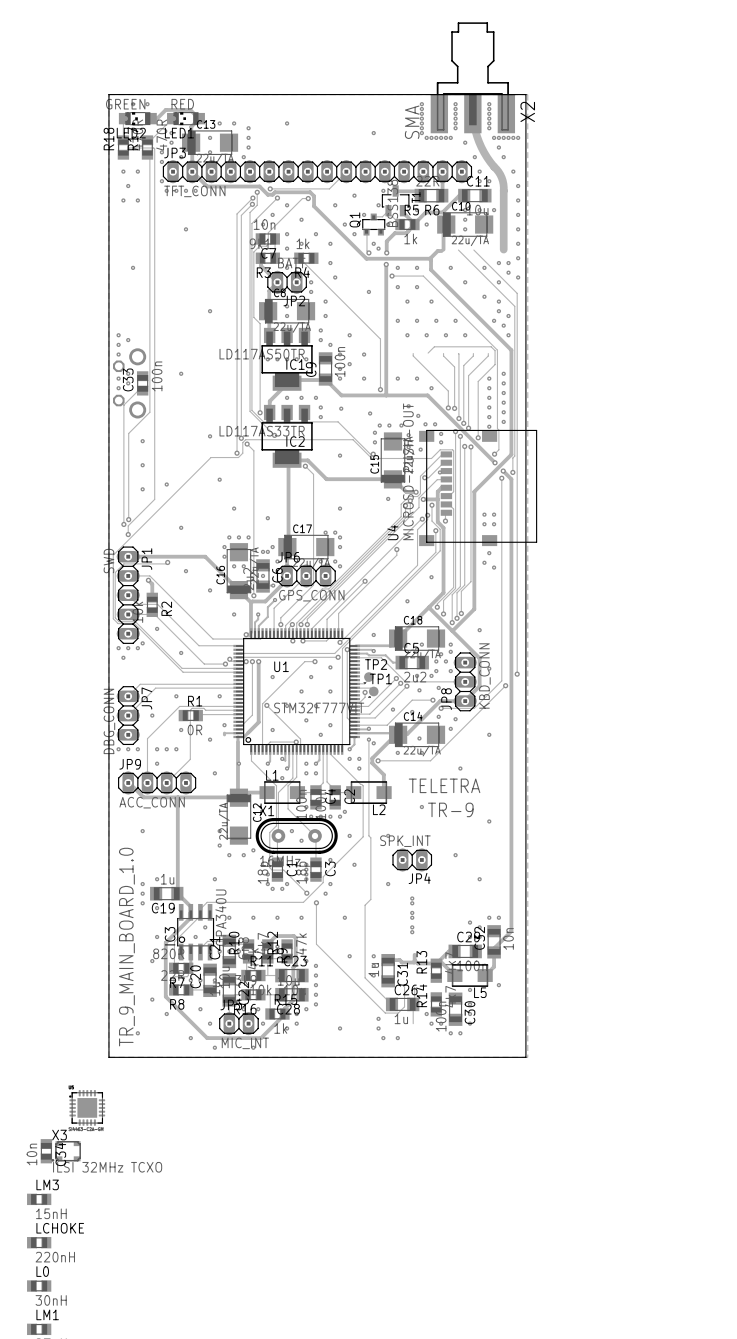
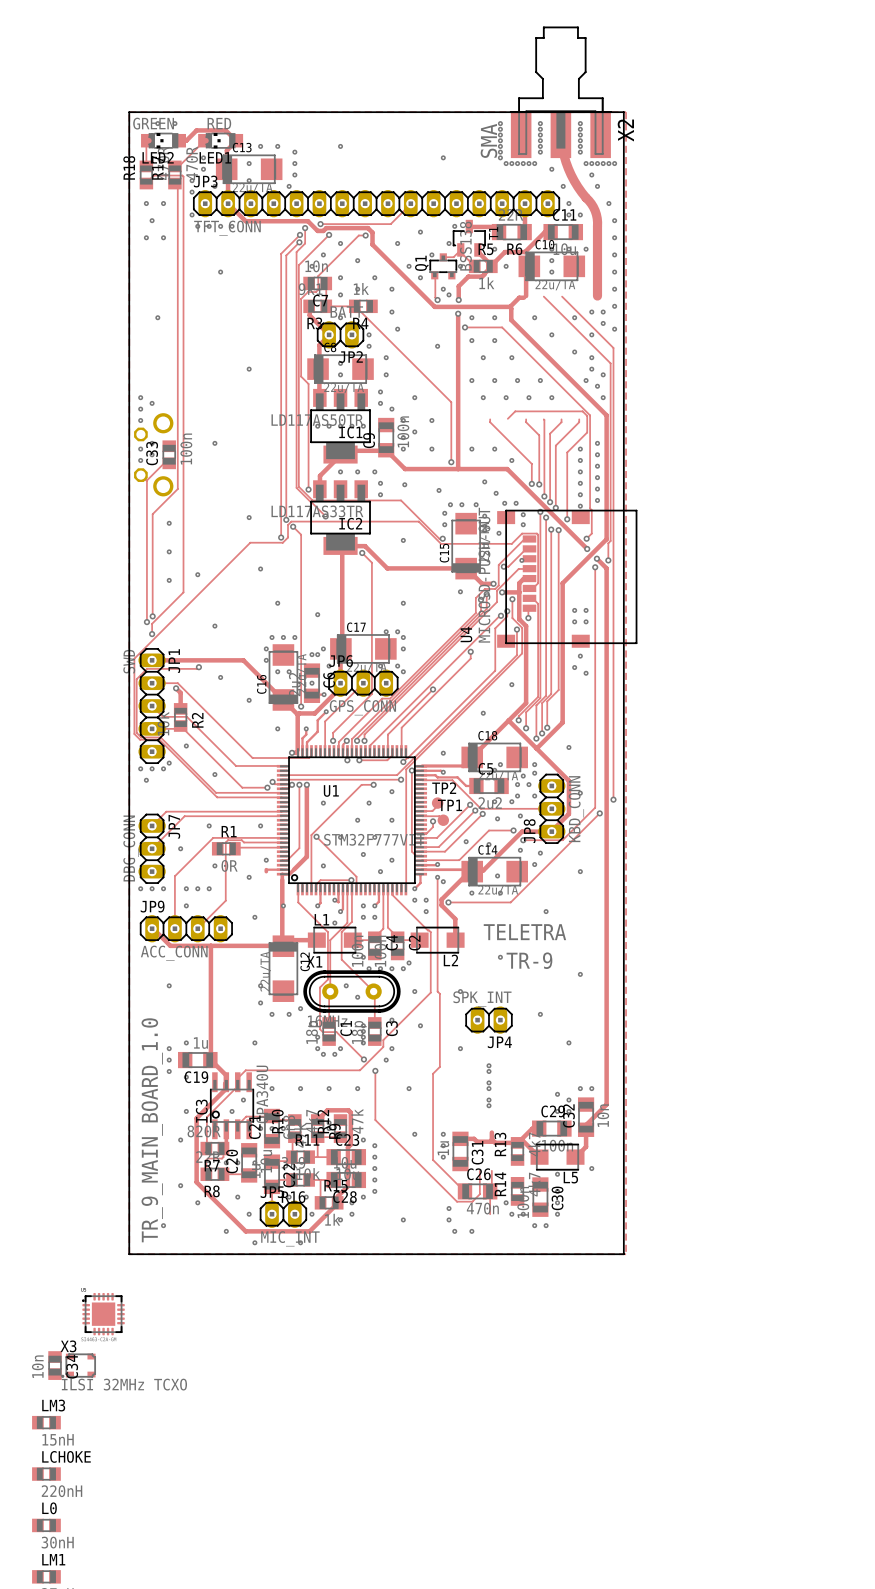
C26 value: 1u (401, 1018) -> 470n (482, 1208)

